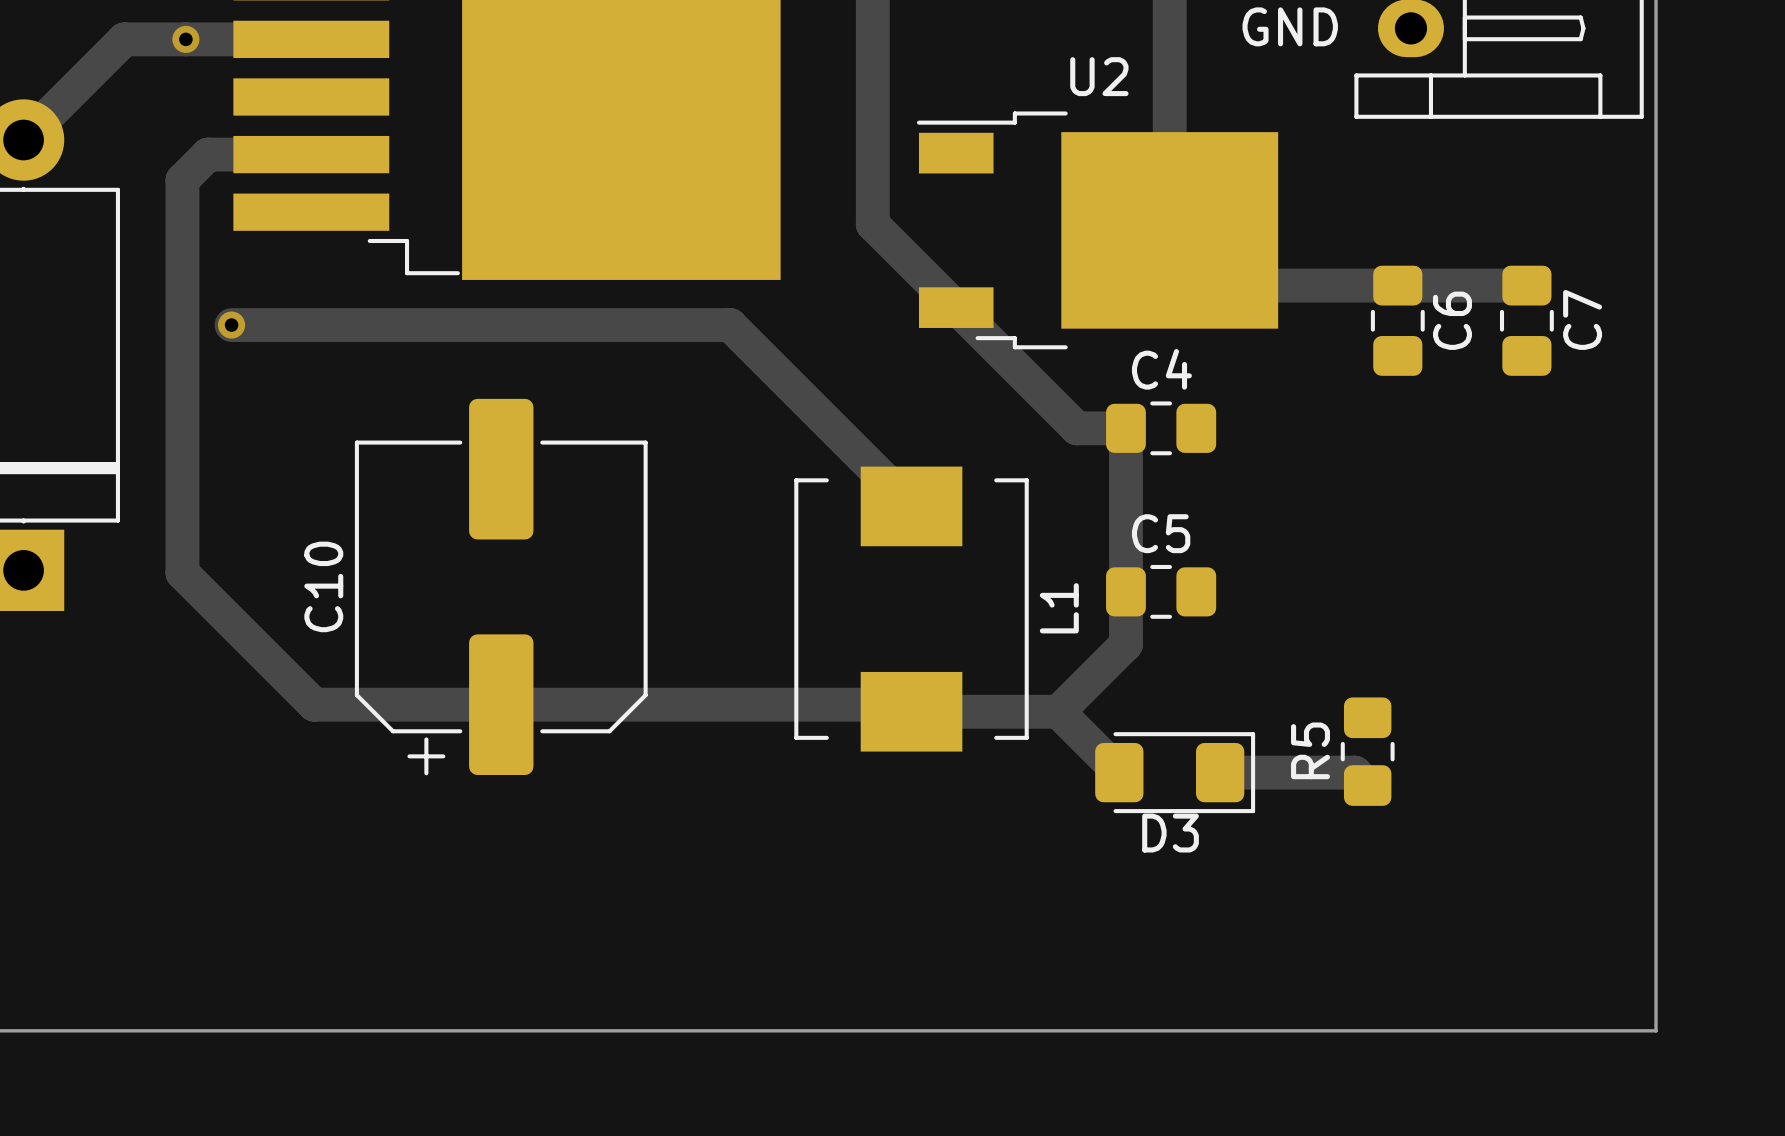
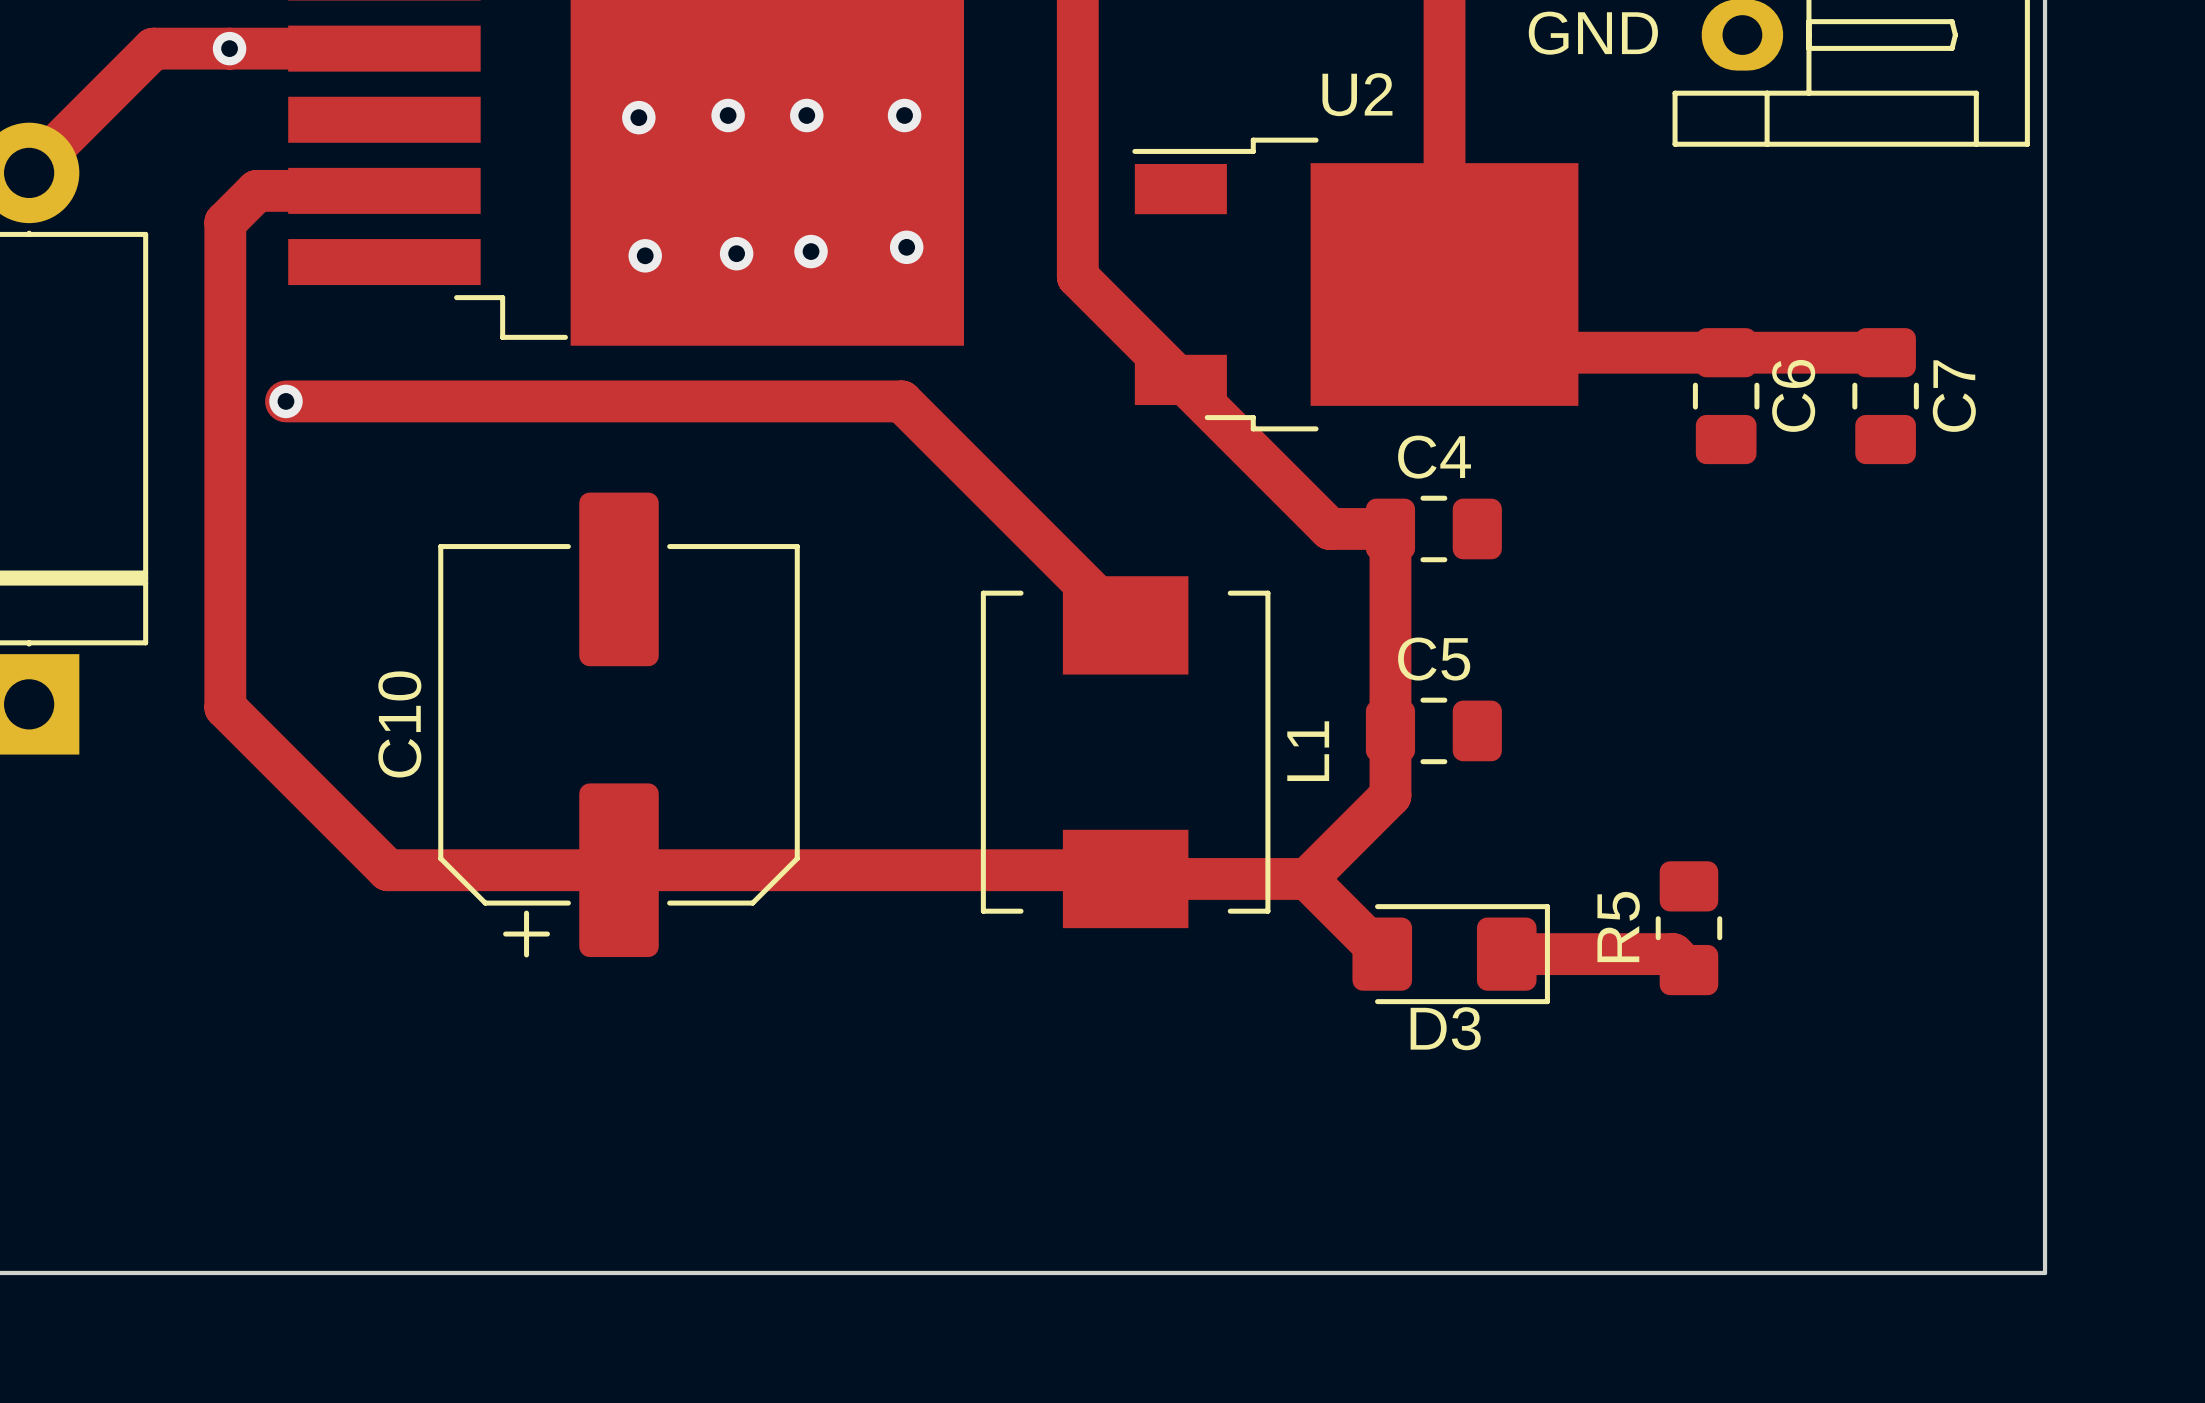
via: none -> (728, 115)
via: none -> (806, 115)
via: none -> (904, 115)
via: none -> (638, 117)
via: none -> (906, 247)
via: none -> (811, 251)
via: none -> (736, 253)
via: none -> (645, 255)

